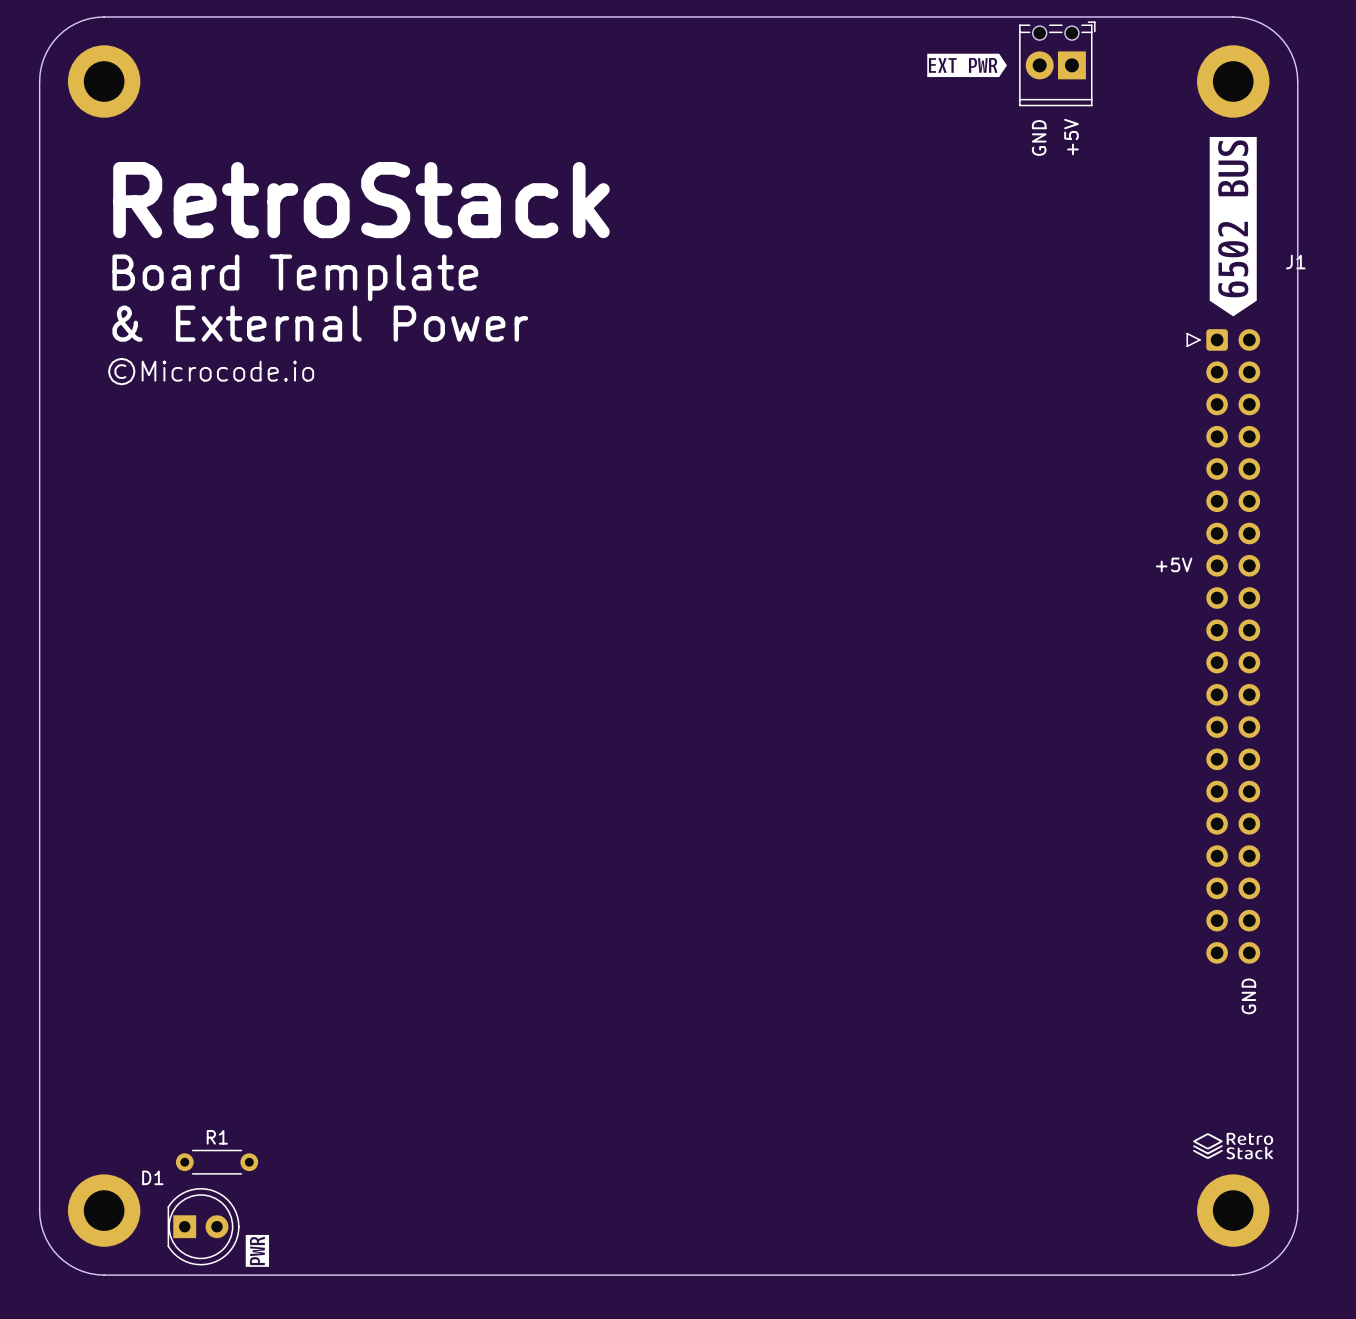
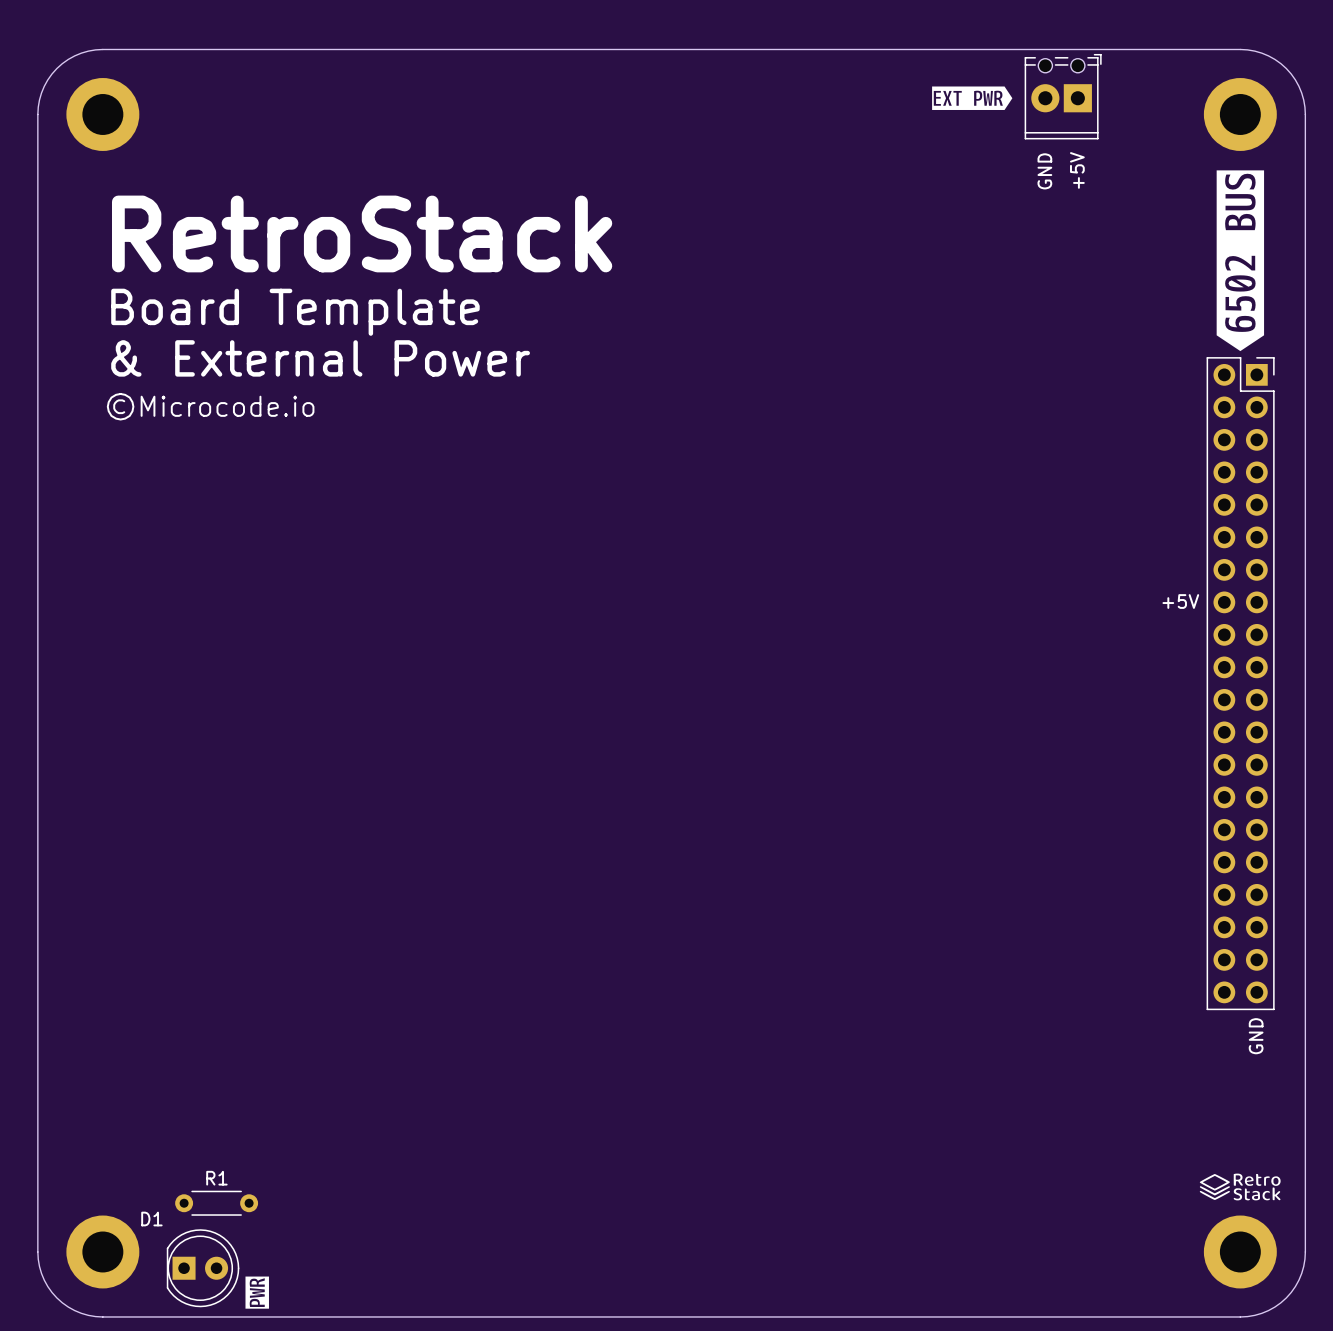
J1: (1223, 646) -> none
part: none -> (1240, 683)

